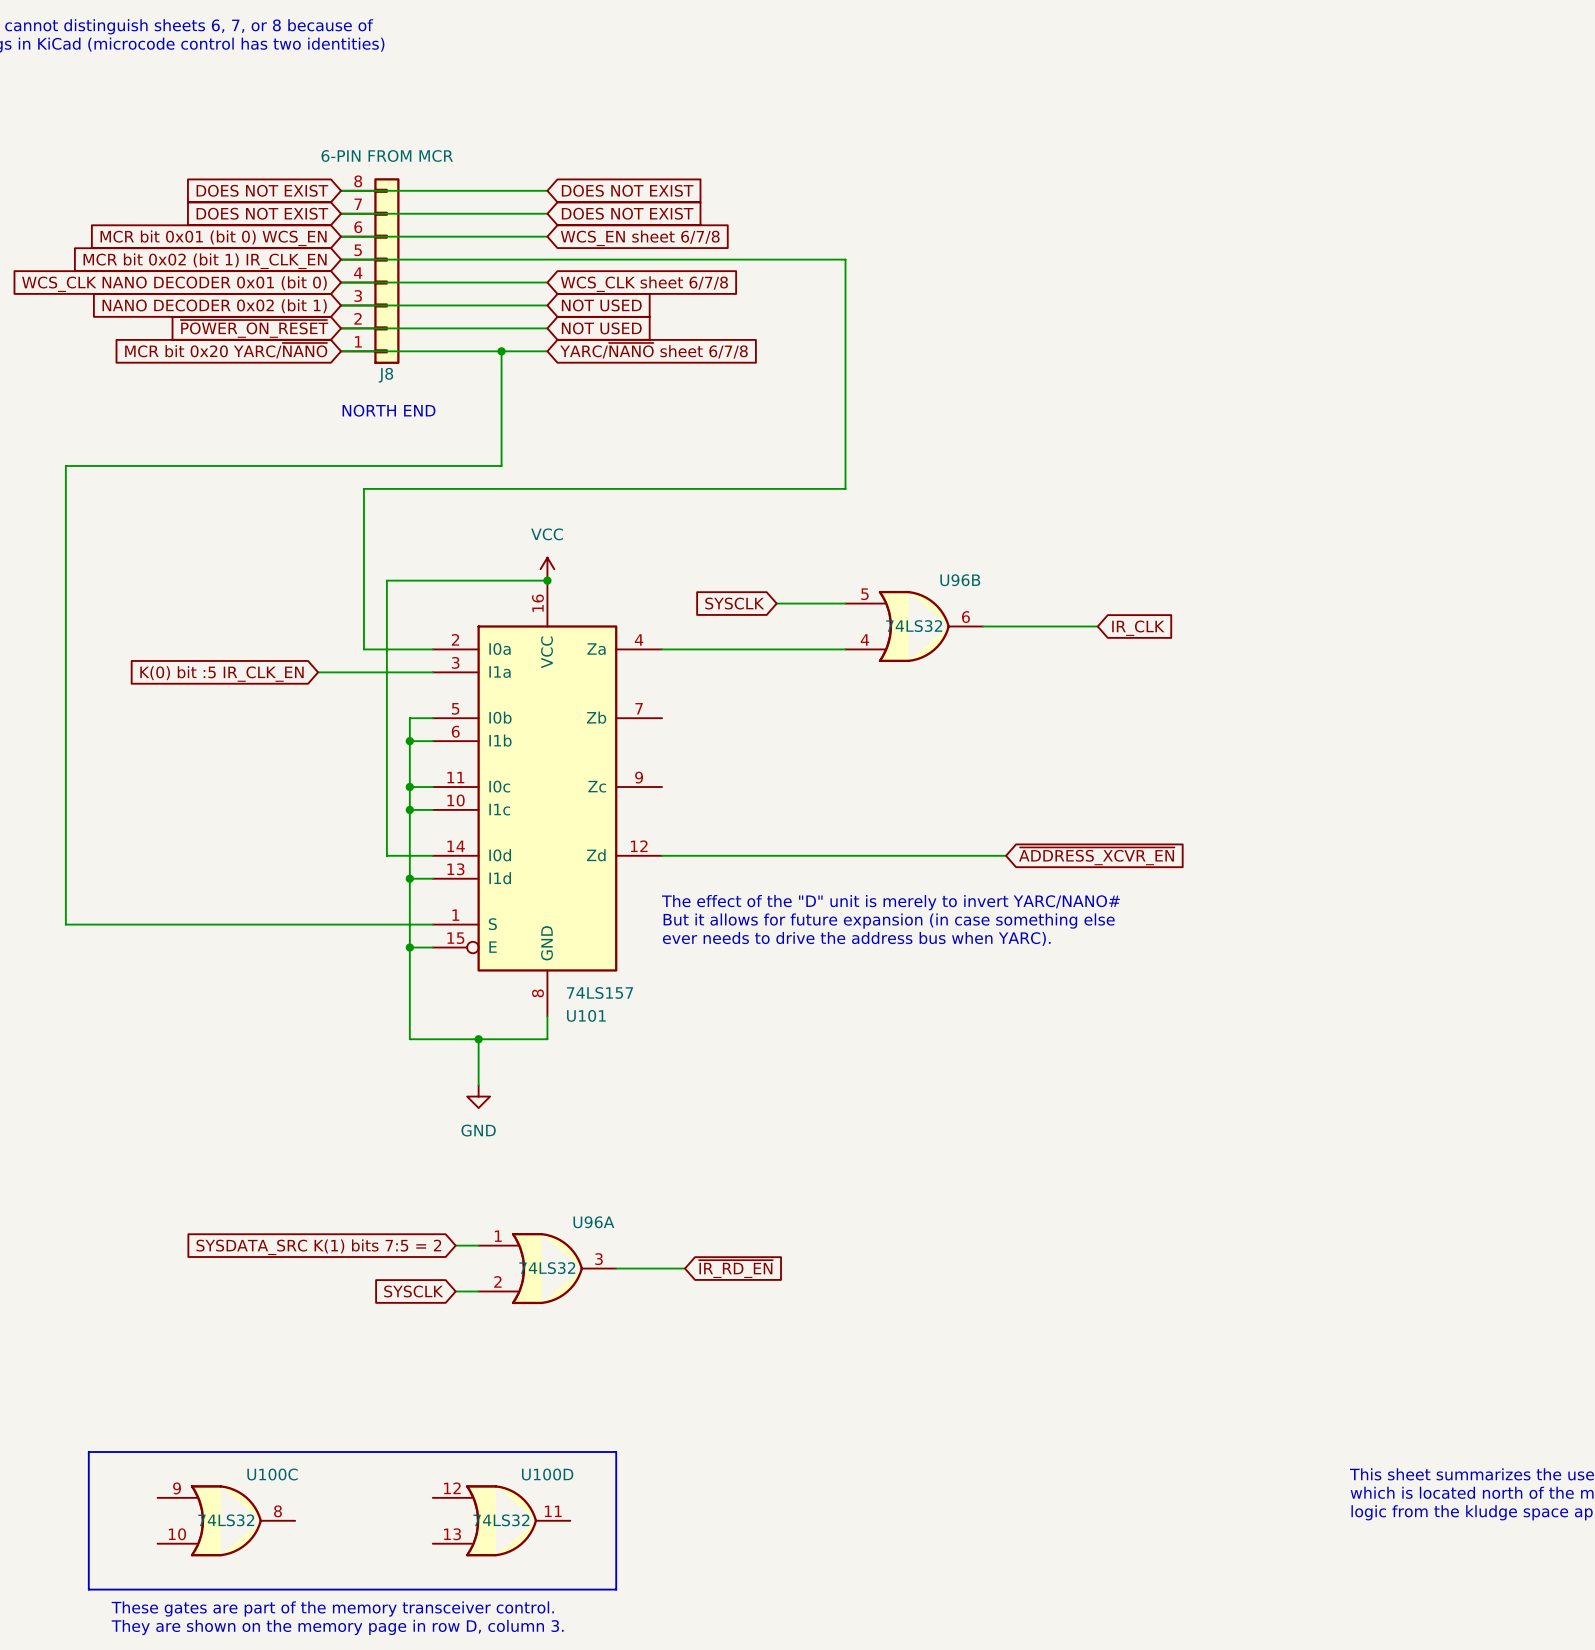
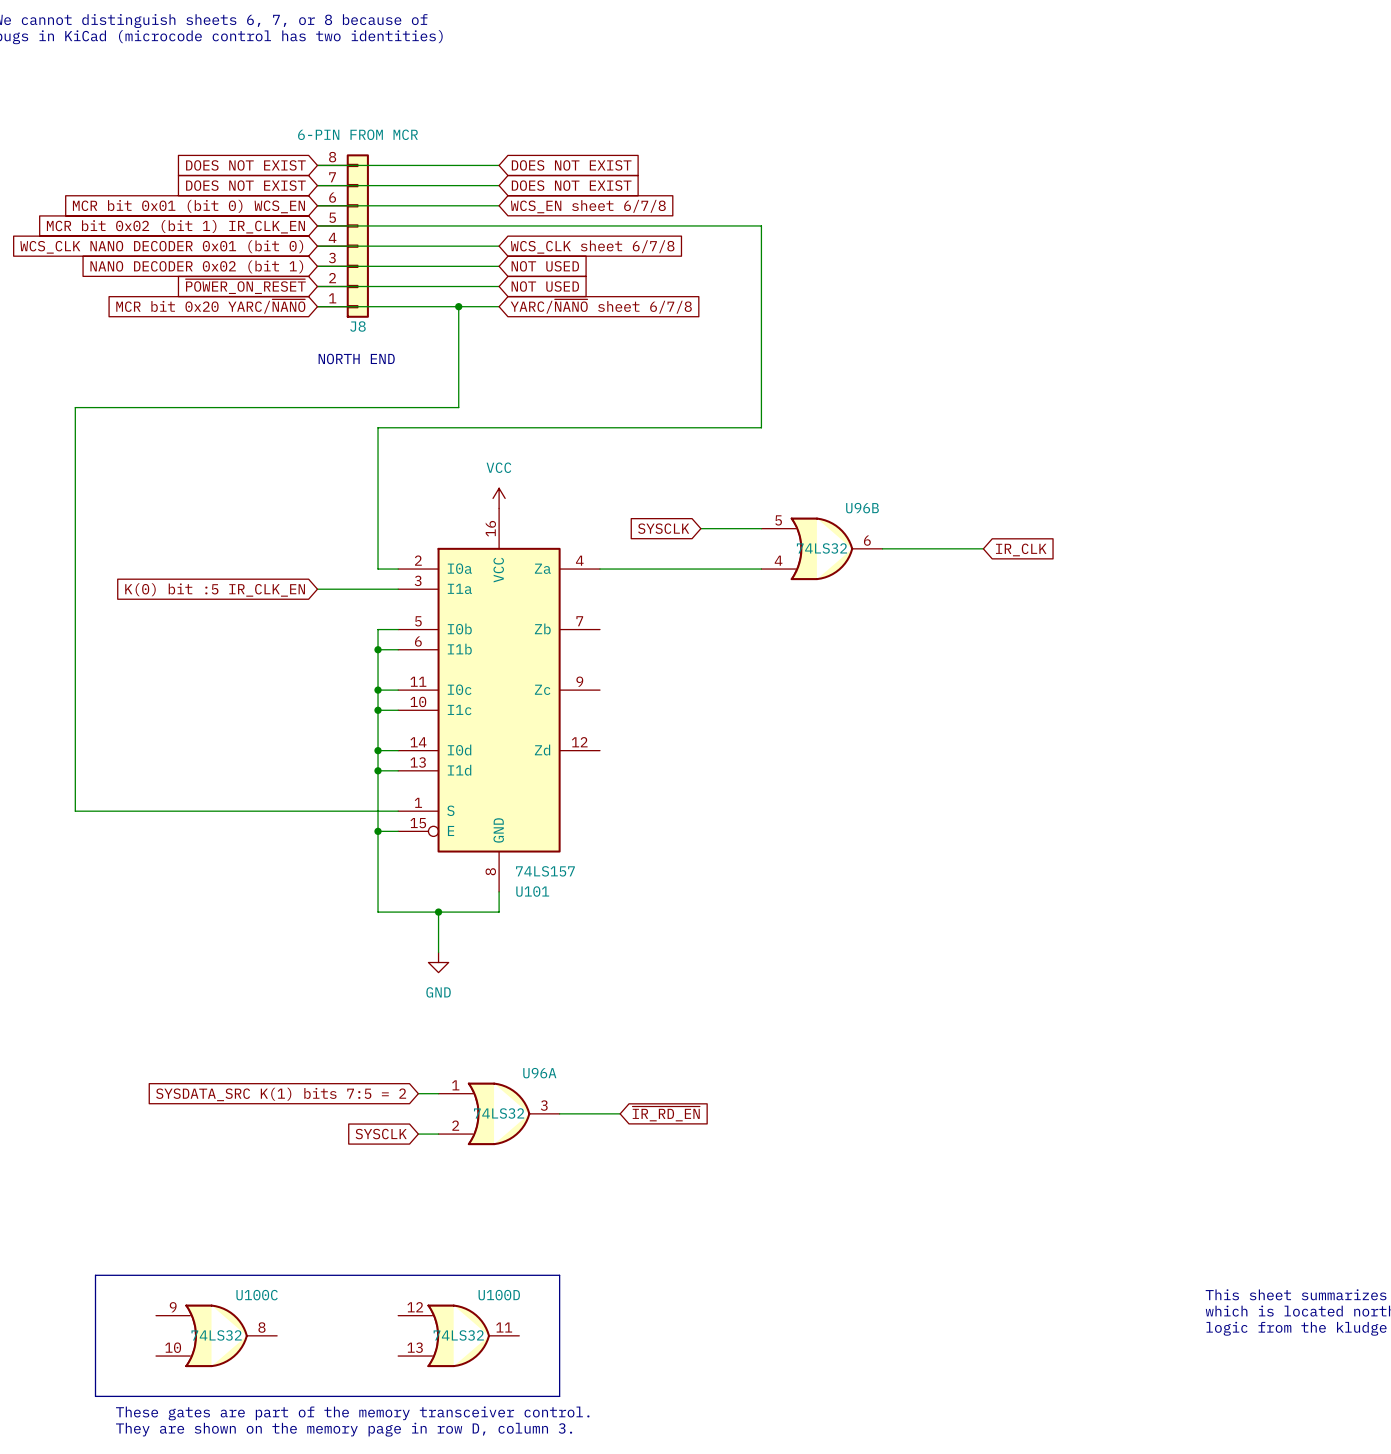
wire: (409, 488) (363, 488) (363, 649) (409, 649) -> (378, 427) (378, 569)
wire: (547, 580) (386, 580) (386, 855) (409, 855) -> none
junction: (547, 580) -> none
wire: (318, 672) (341, 672) -> none
global label position: K(0) bit :5 IR_CLK_EN (221, 673) -> K(0) bit :5 IR_CLK_EN (215, 589)
junction: none -> (378, 750)
wire: (662, 855) (1006, 855) -> none
global label: ~{ADDRESS_XCVR_EN} (1096, 856) -> none
text: The effect of the "D" unit is merely to invert YARC/NANO# (890, 902) -> none
text: But it allows for future expansion (in case something else (889, 921) -> none
text: ever needs to drive the address bus when YARC). (856, 938) -> none

